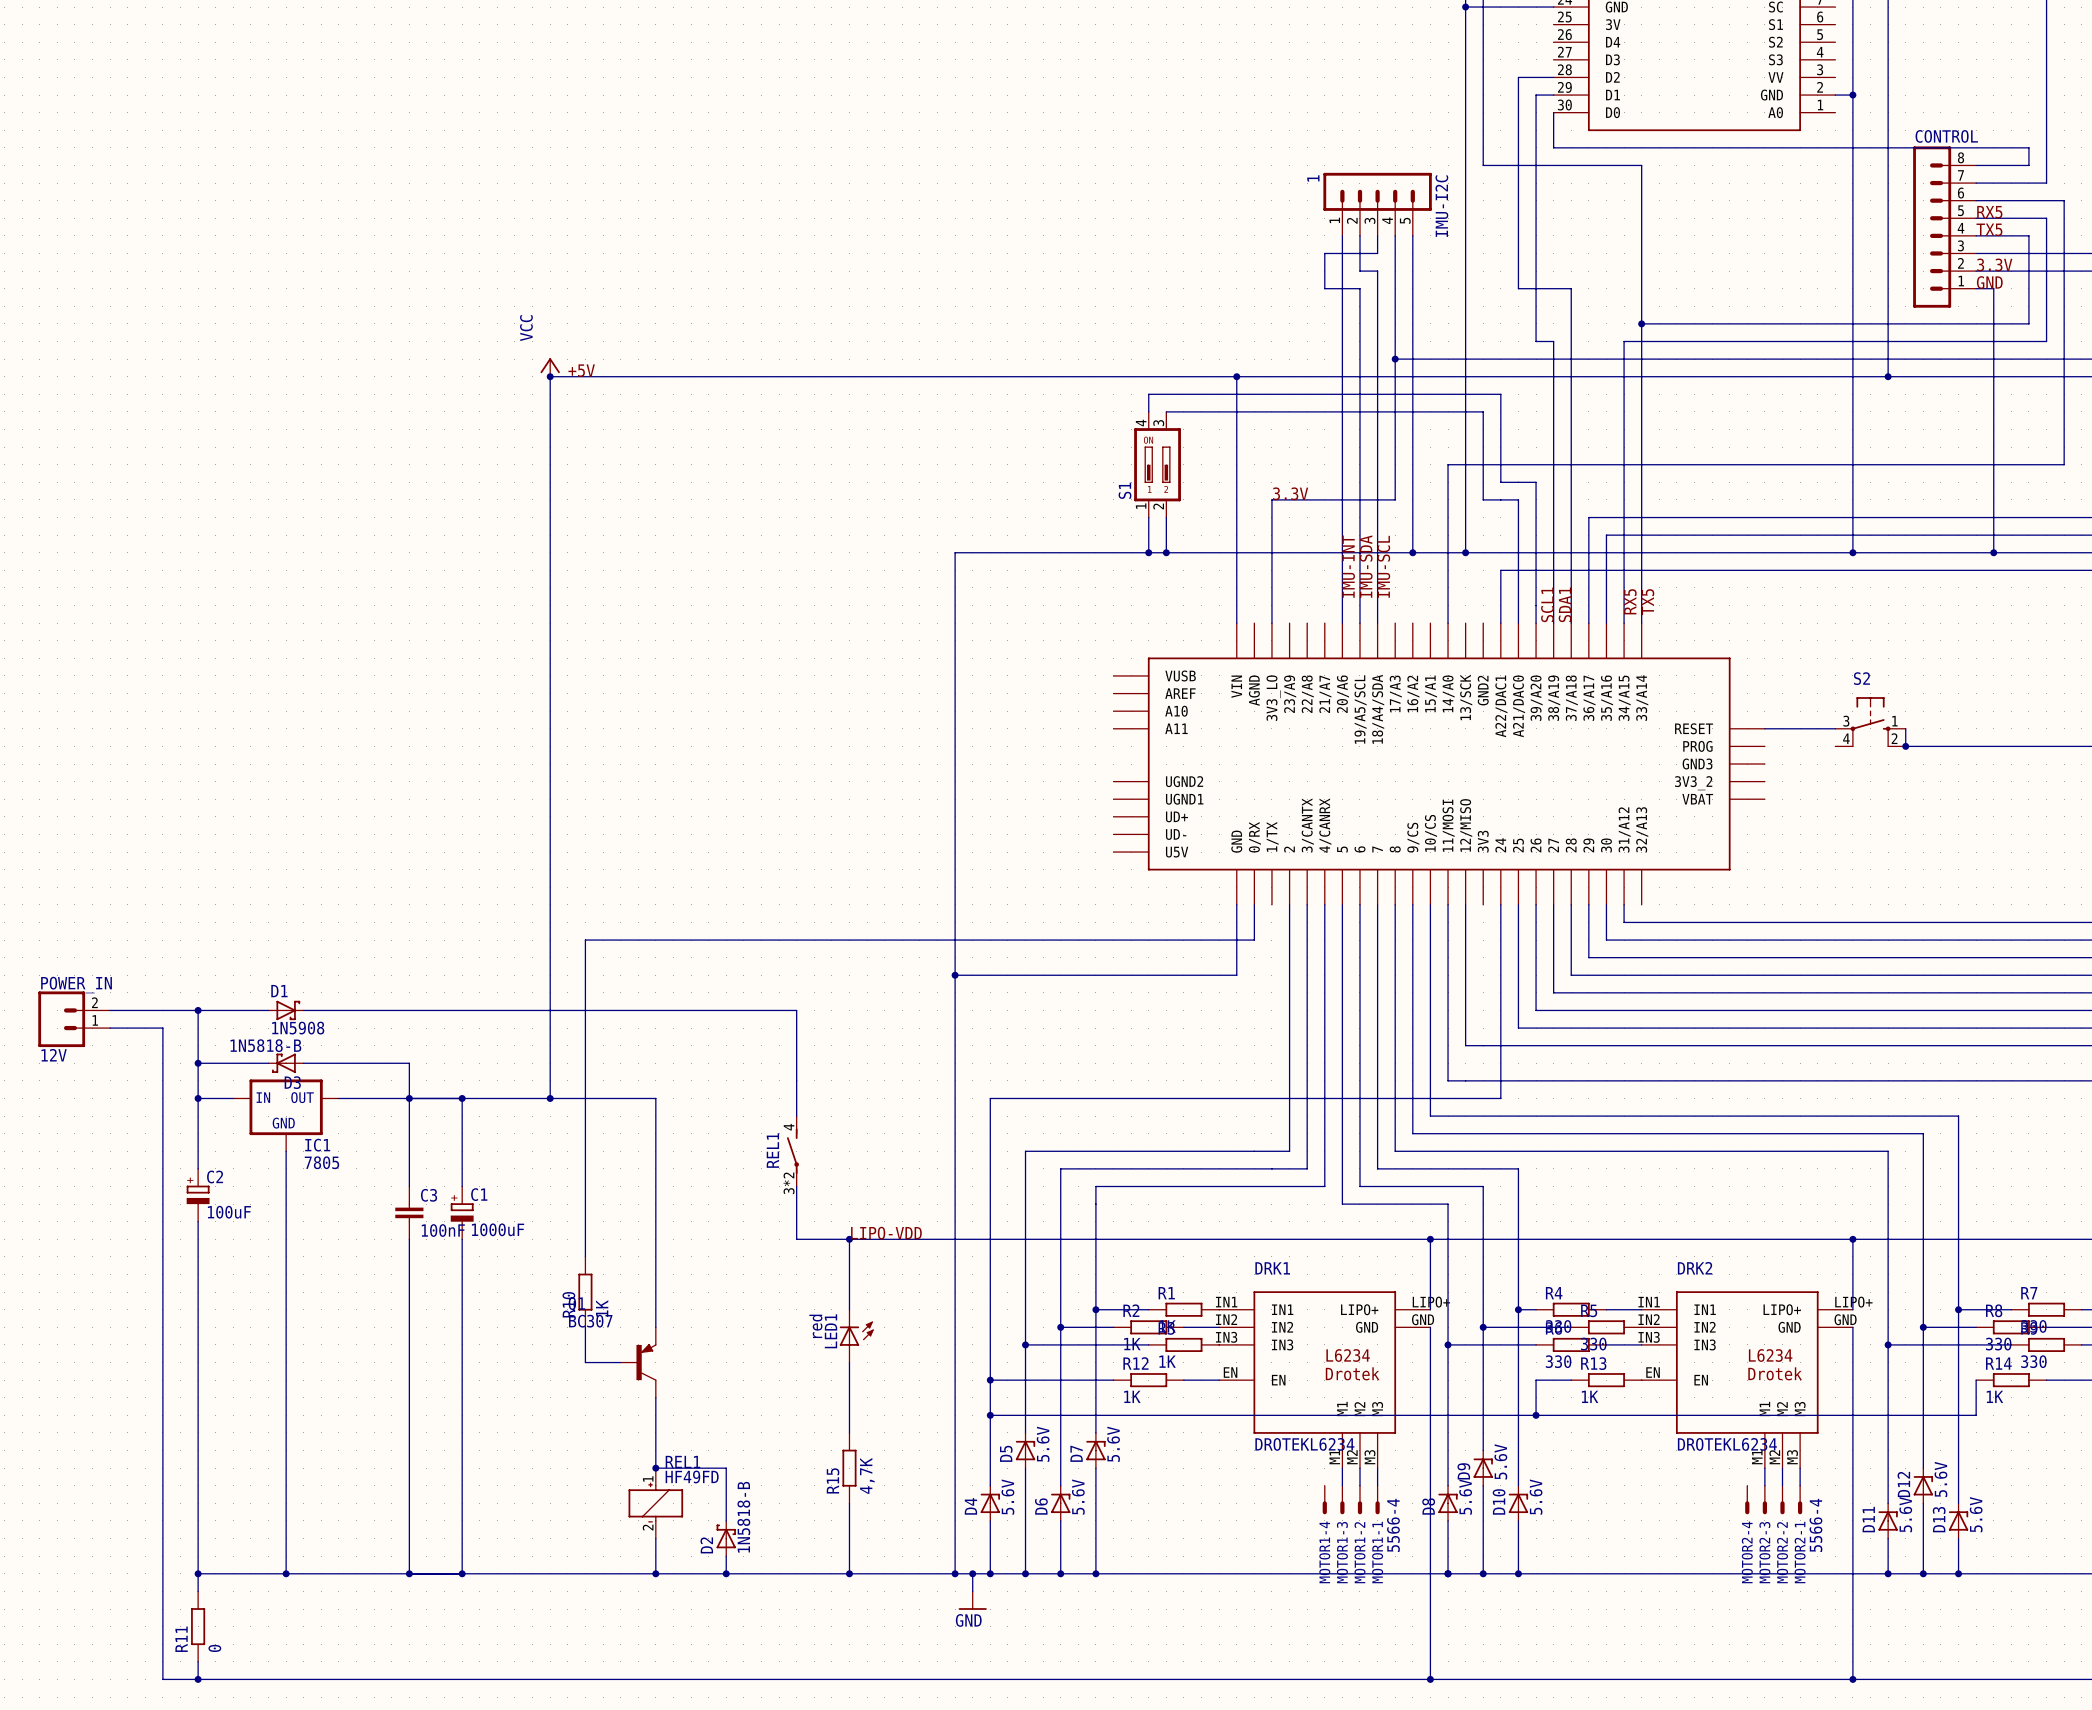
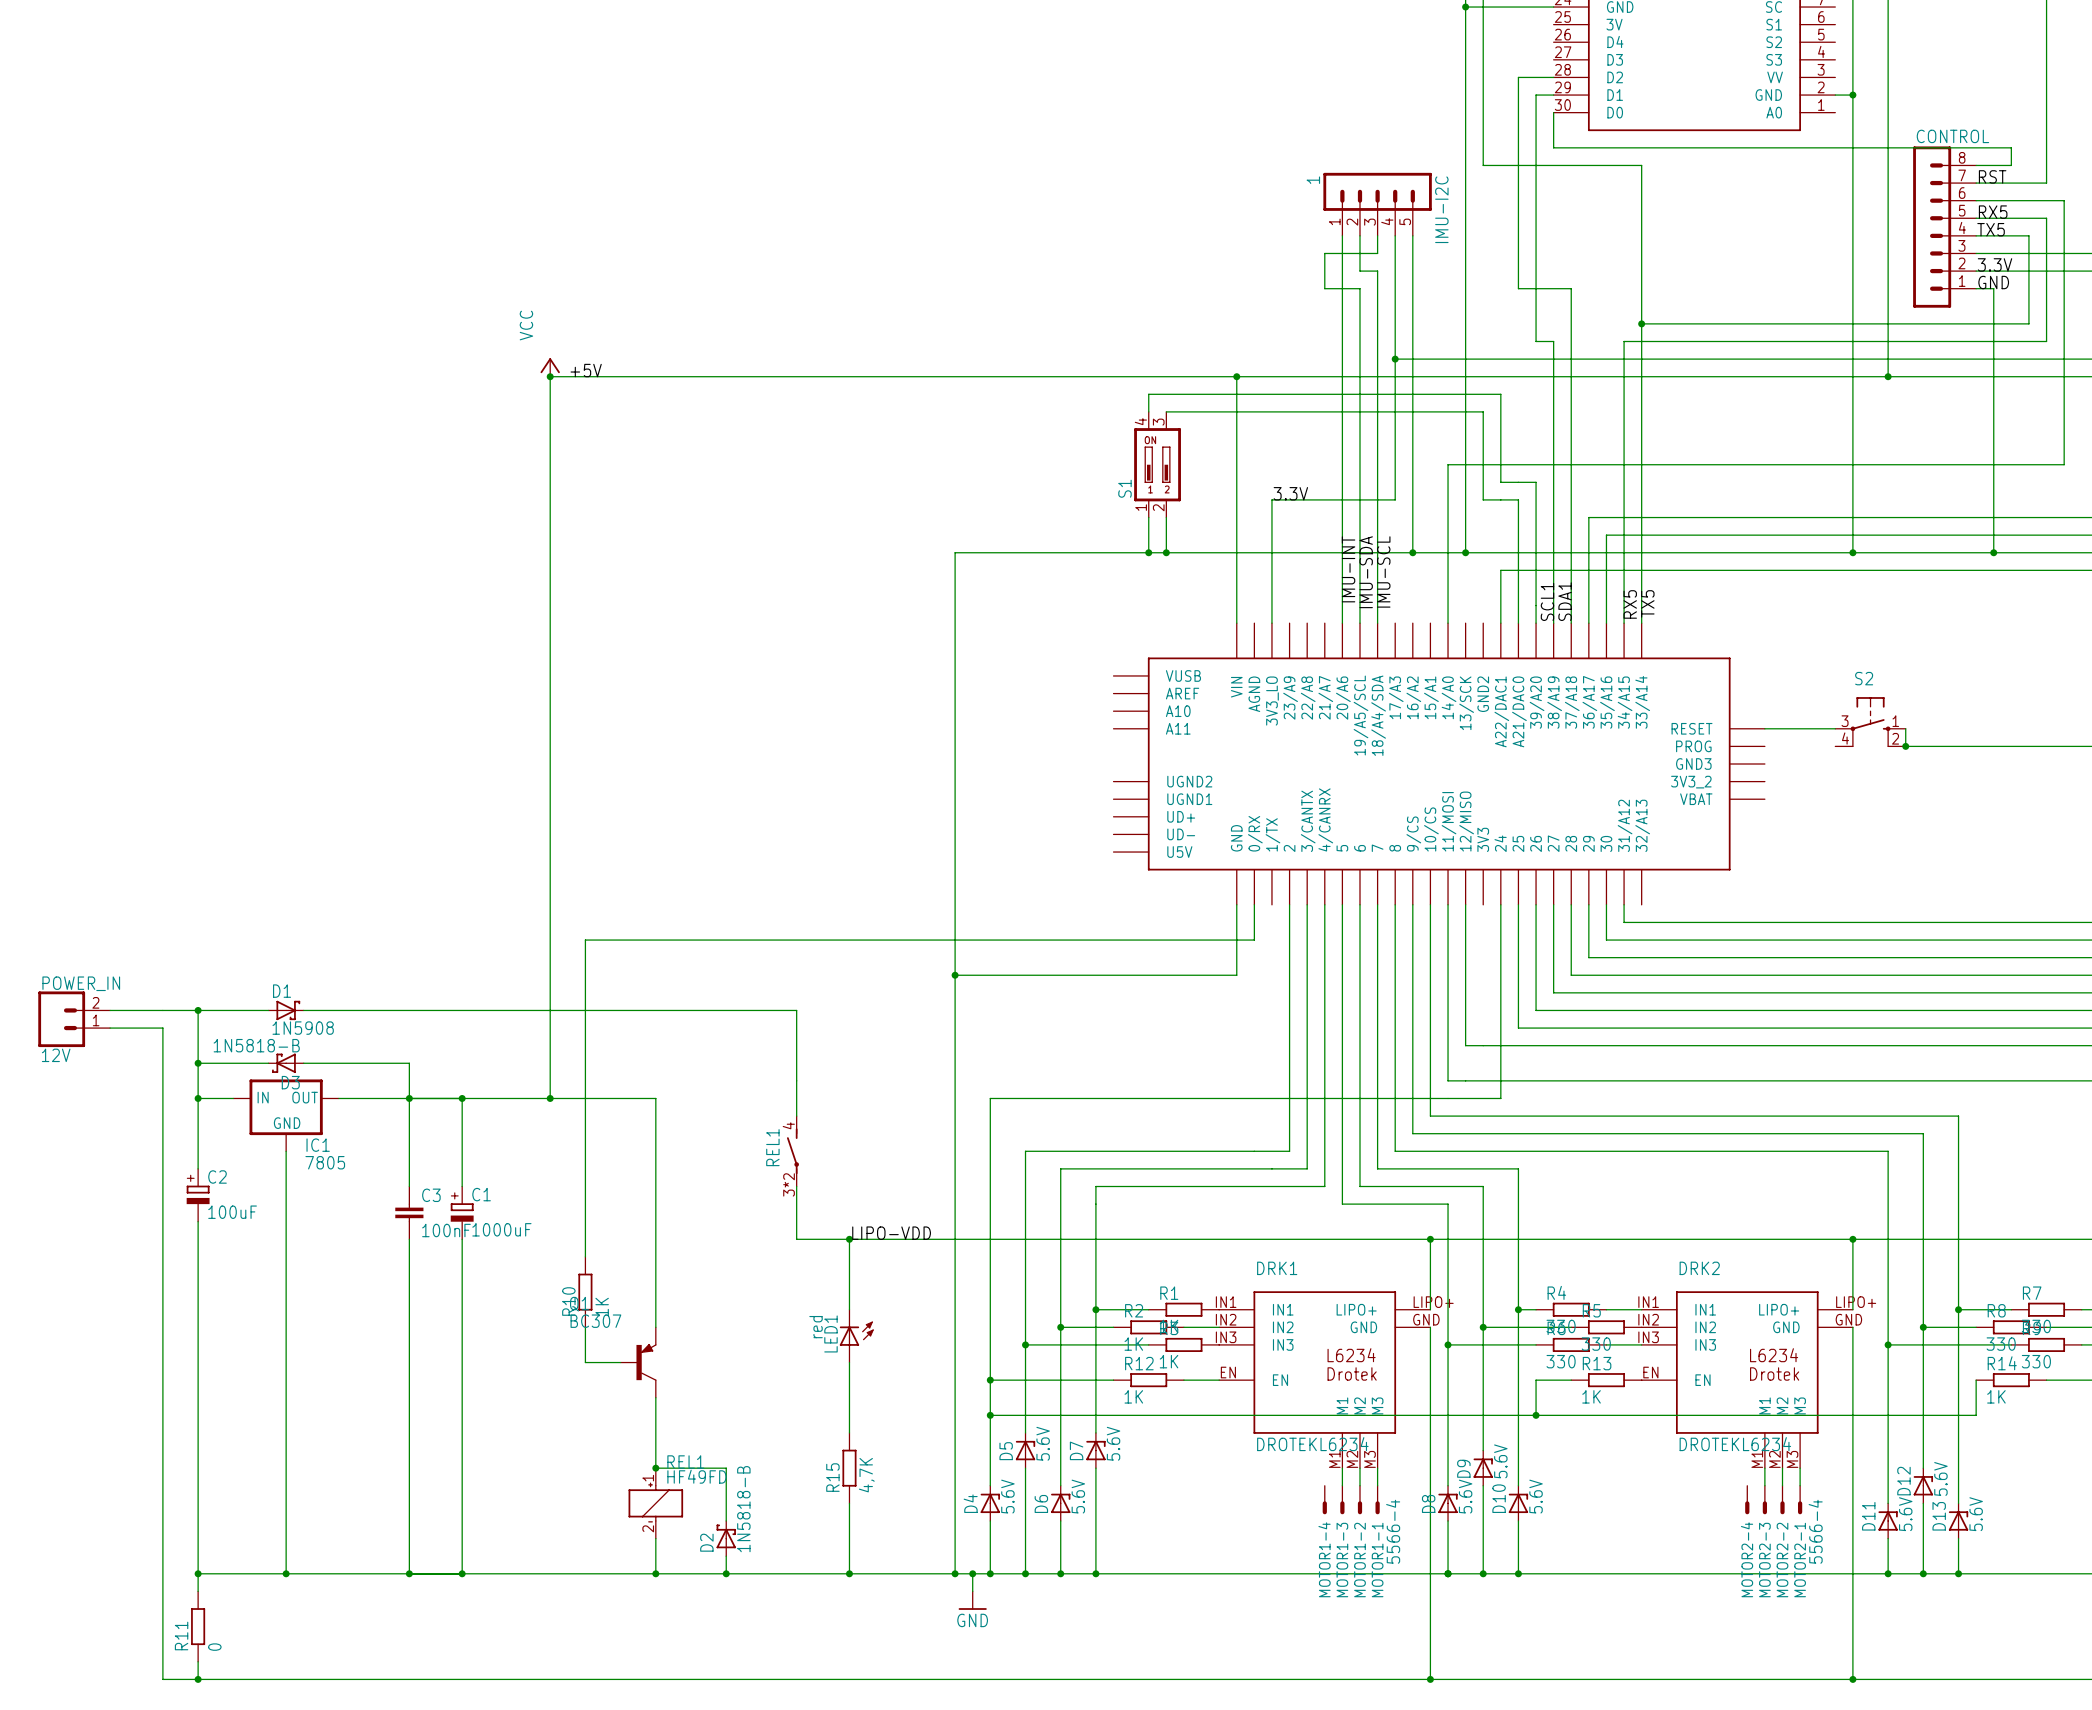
wire: (2011, 147) (2028, 147) (2028, 165) (2011, 165) -> (2011, 147) (2011, 165)
label: none -> RST (1992, 176)

